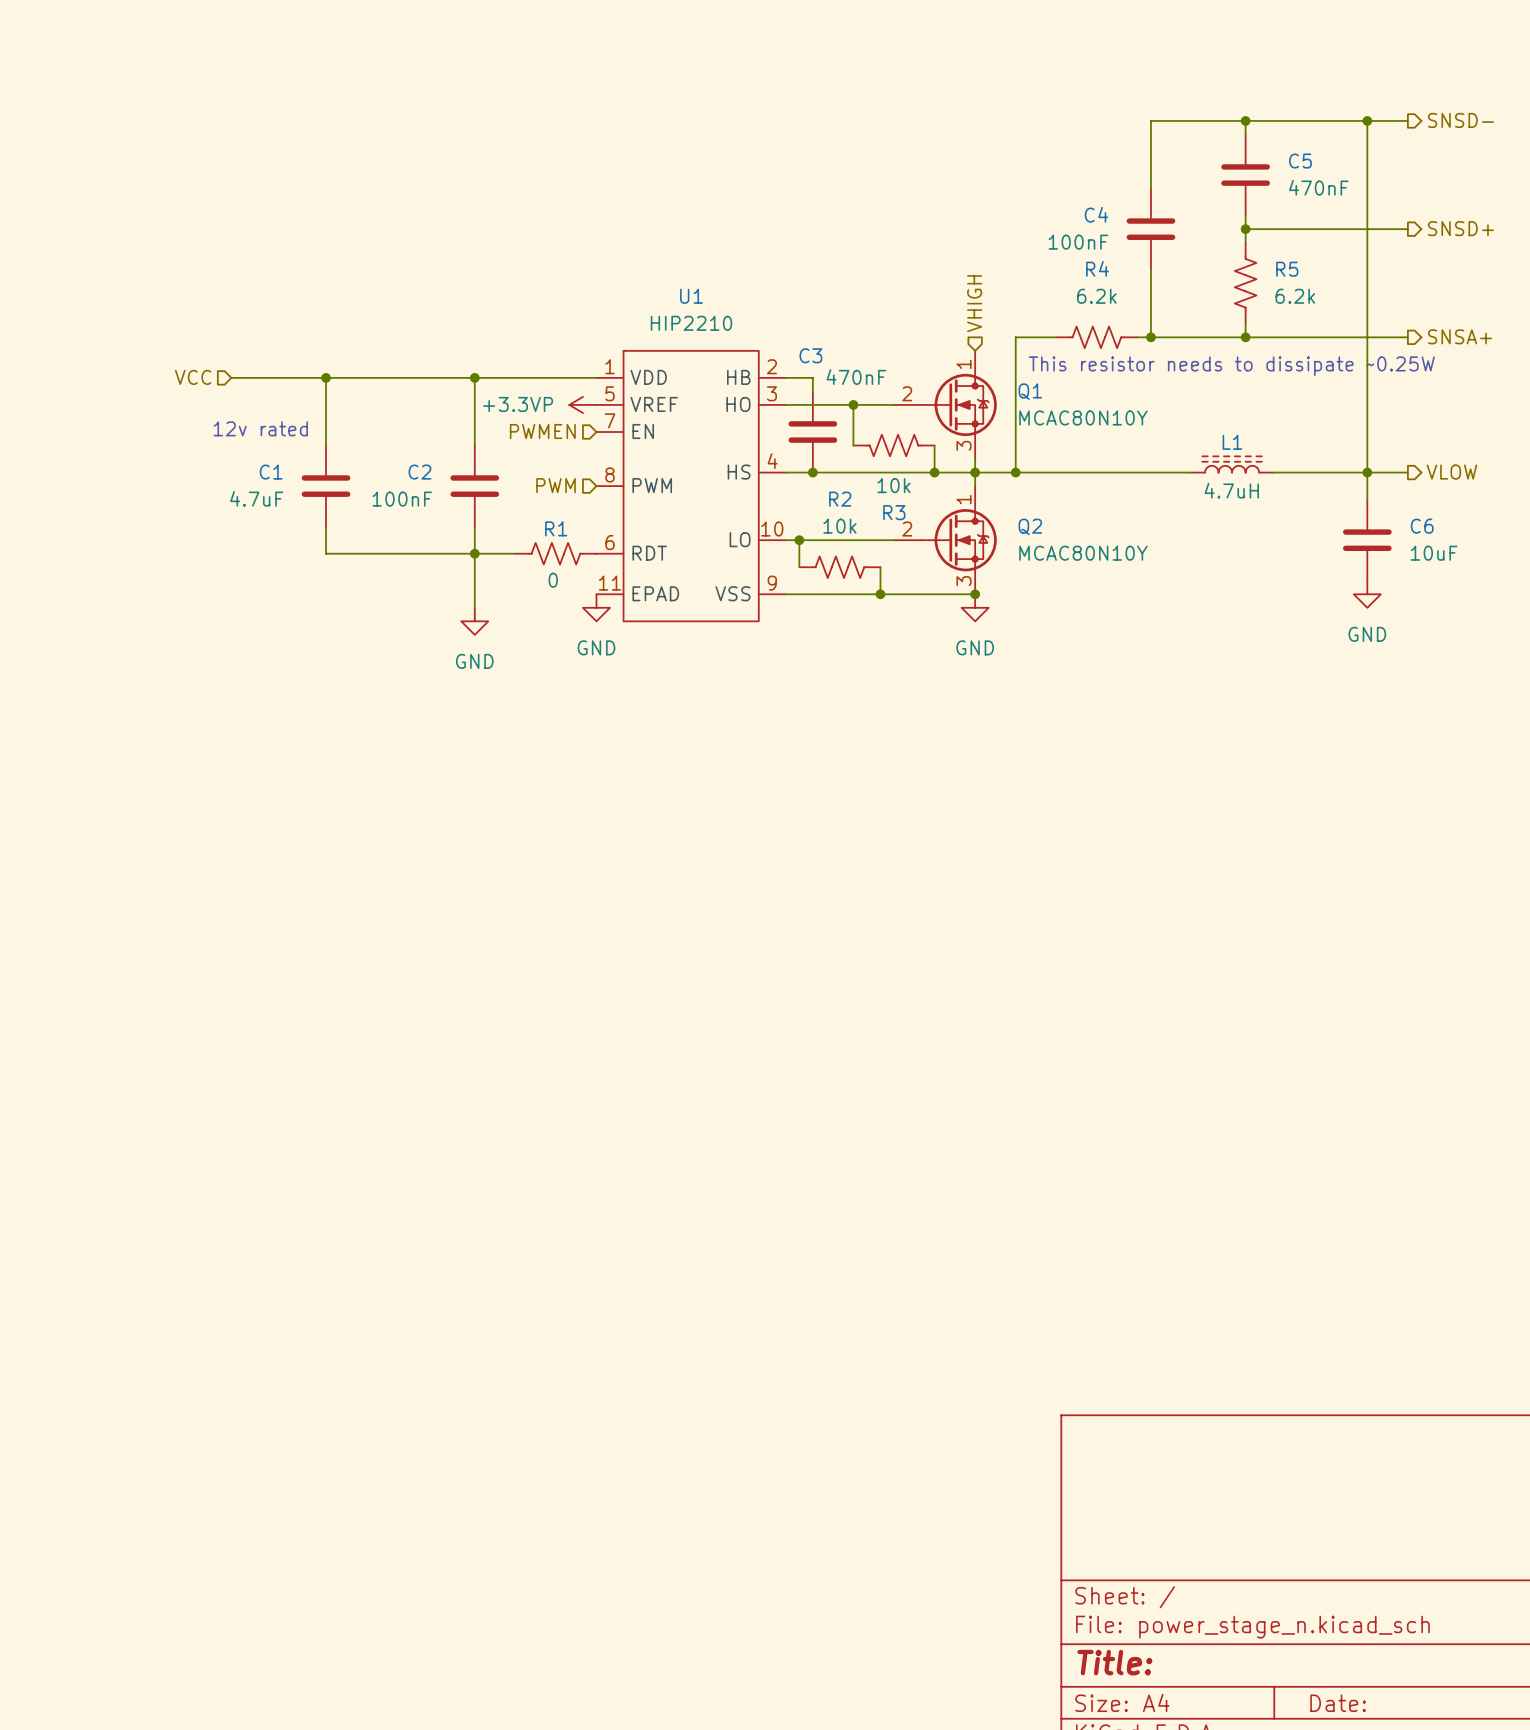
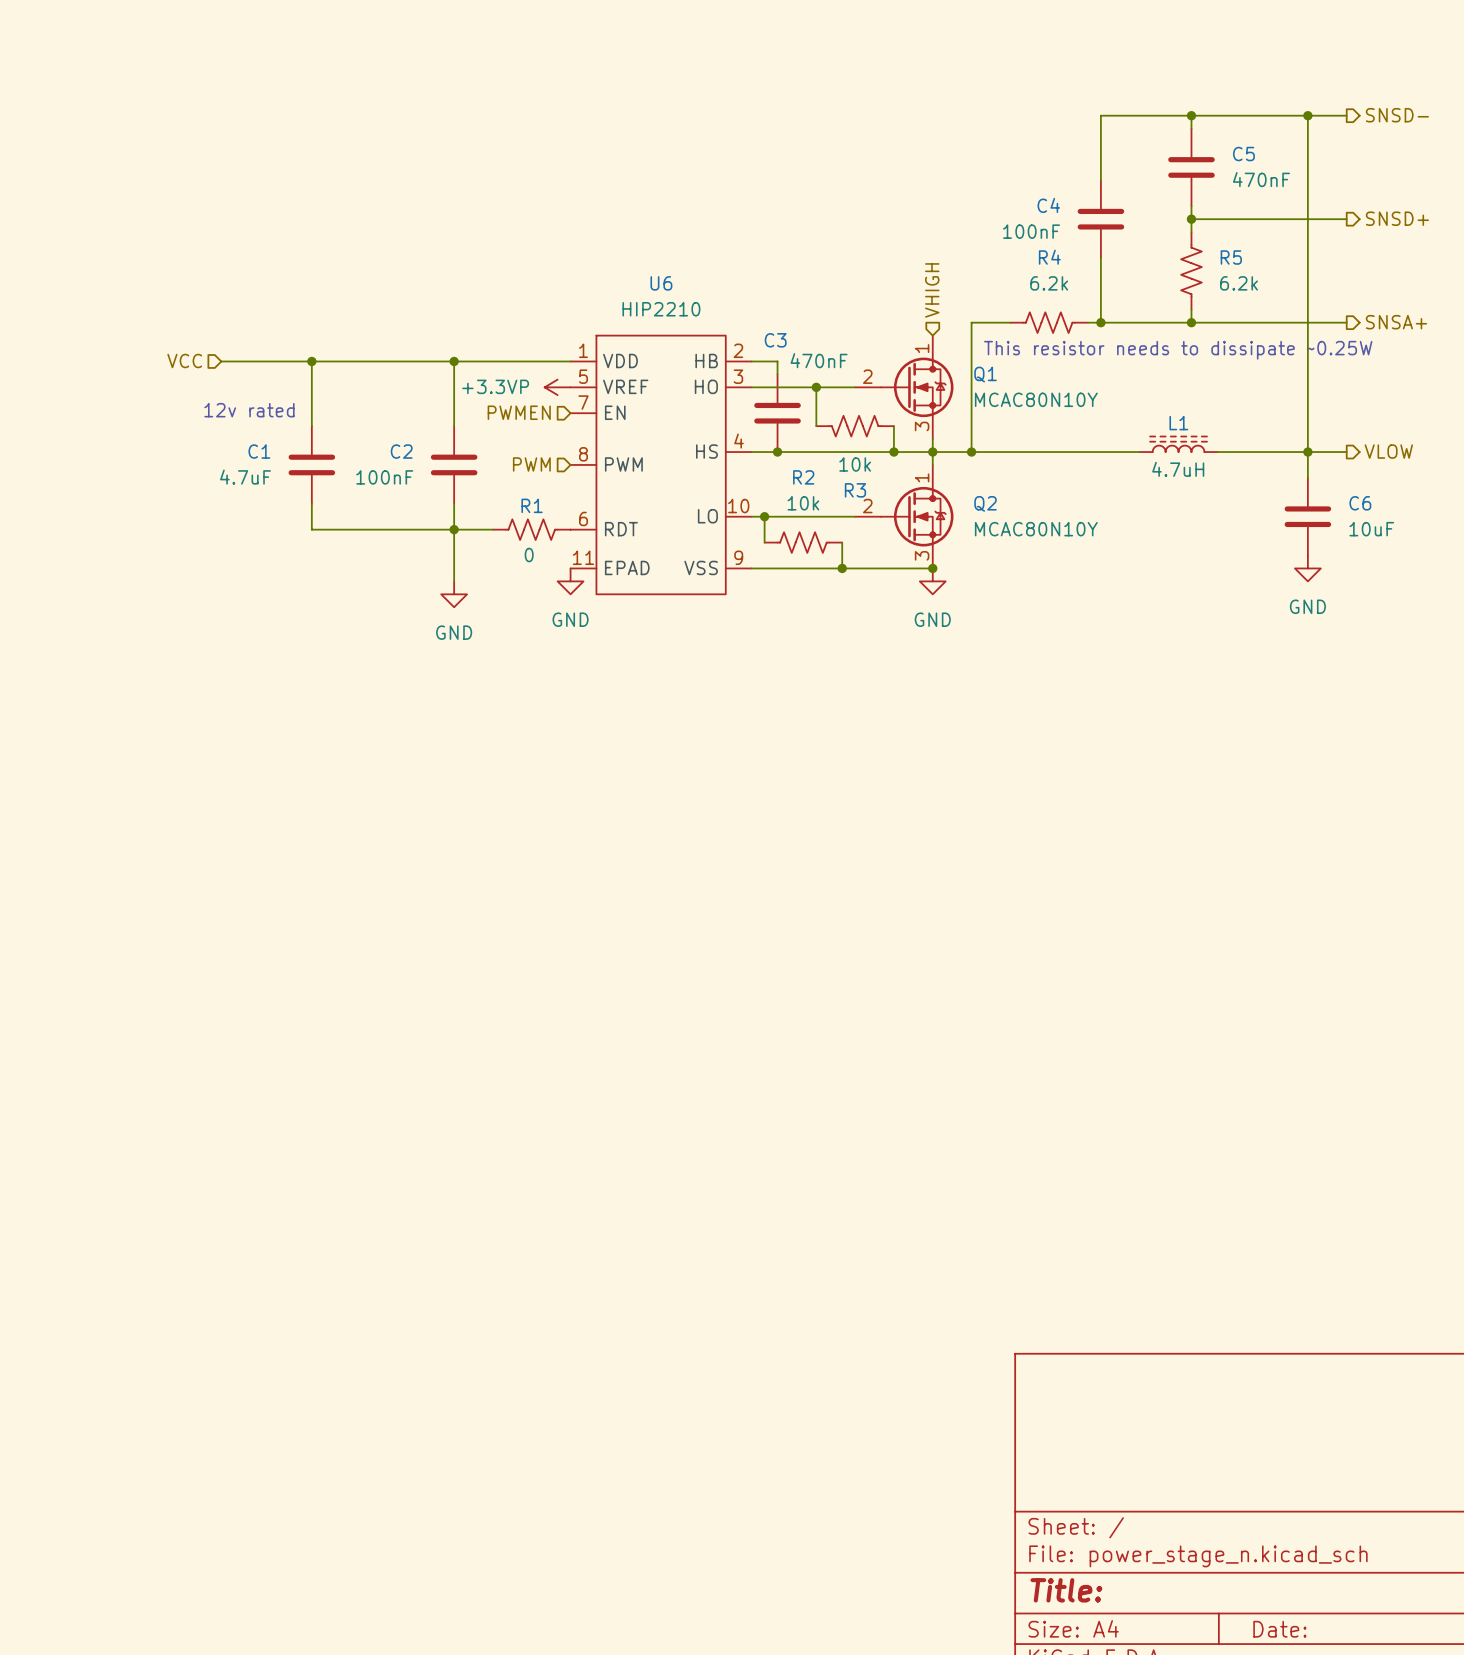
U1 name: U1 (691, 296) -> U6 (661, 283)

